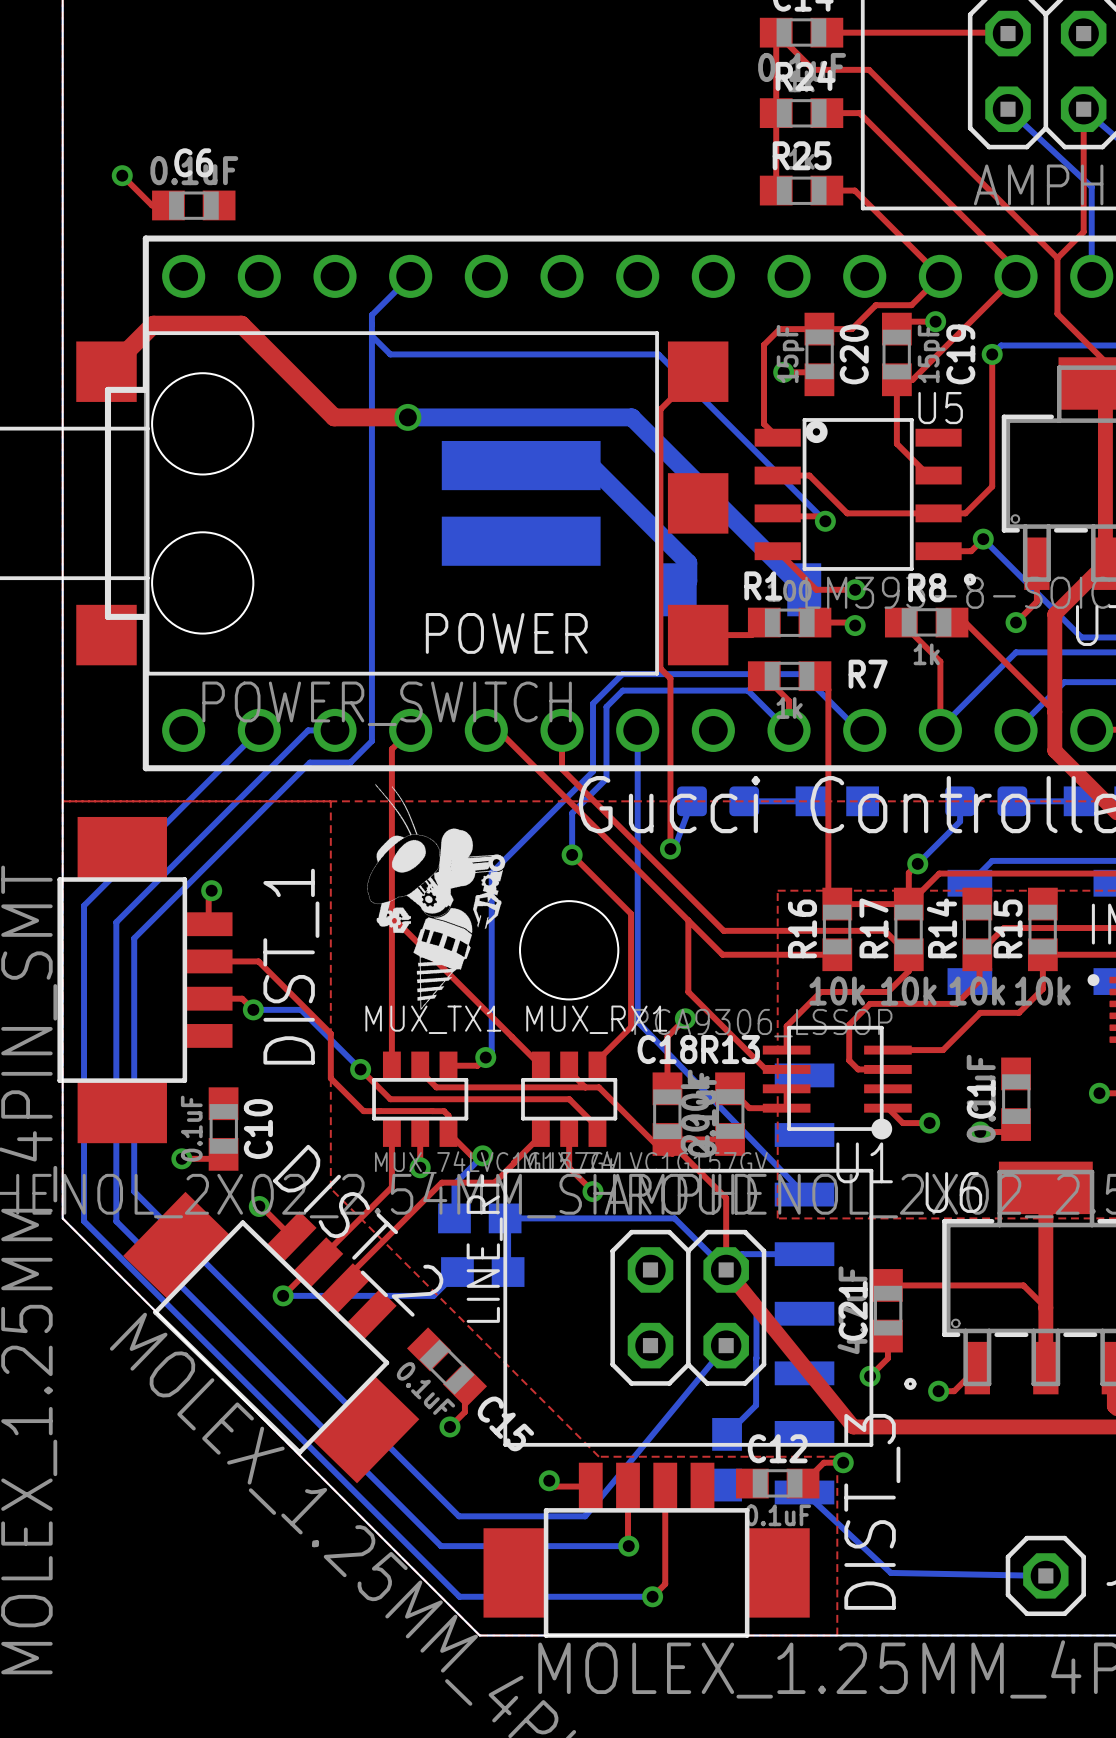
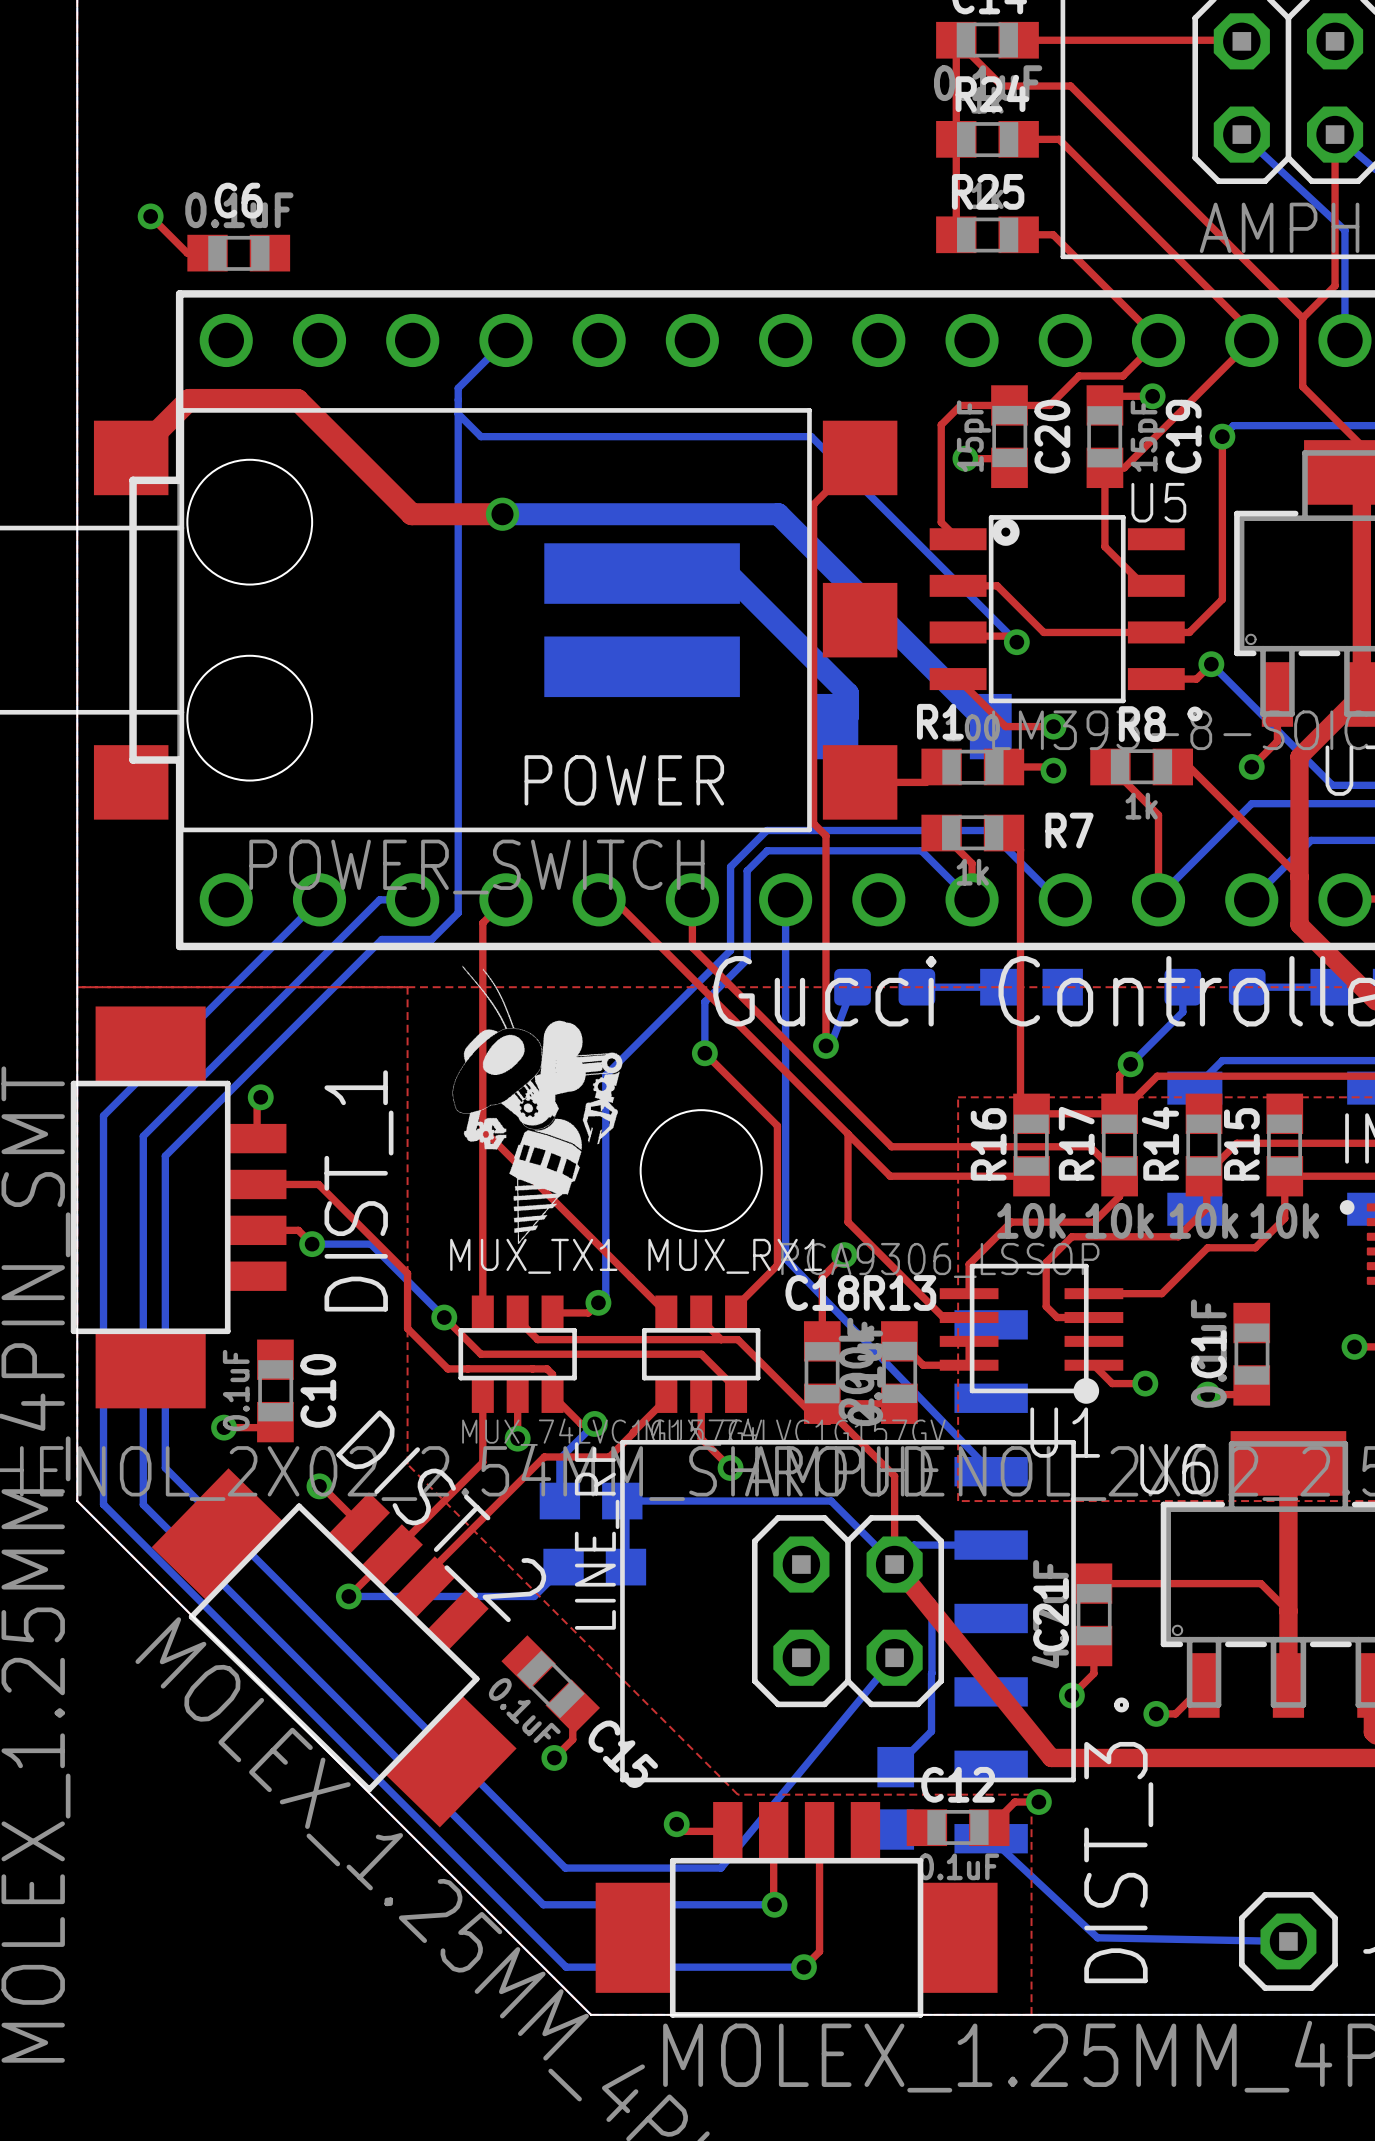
DIST_3 name position: DIST_3 (872, 1511) -> DIST_3 (1118, 1862)

